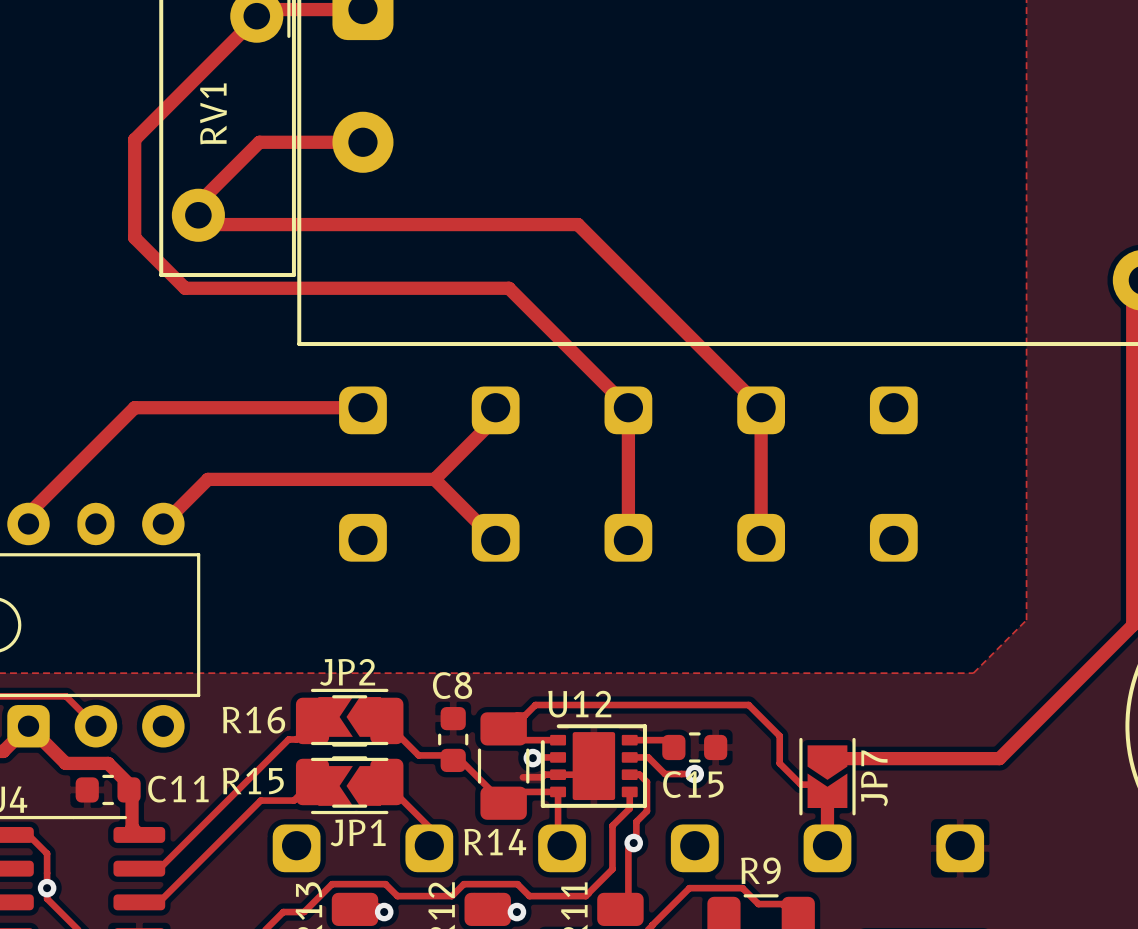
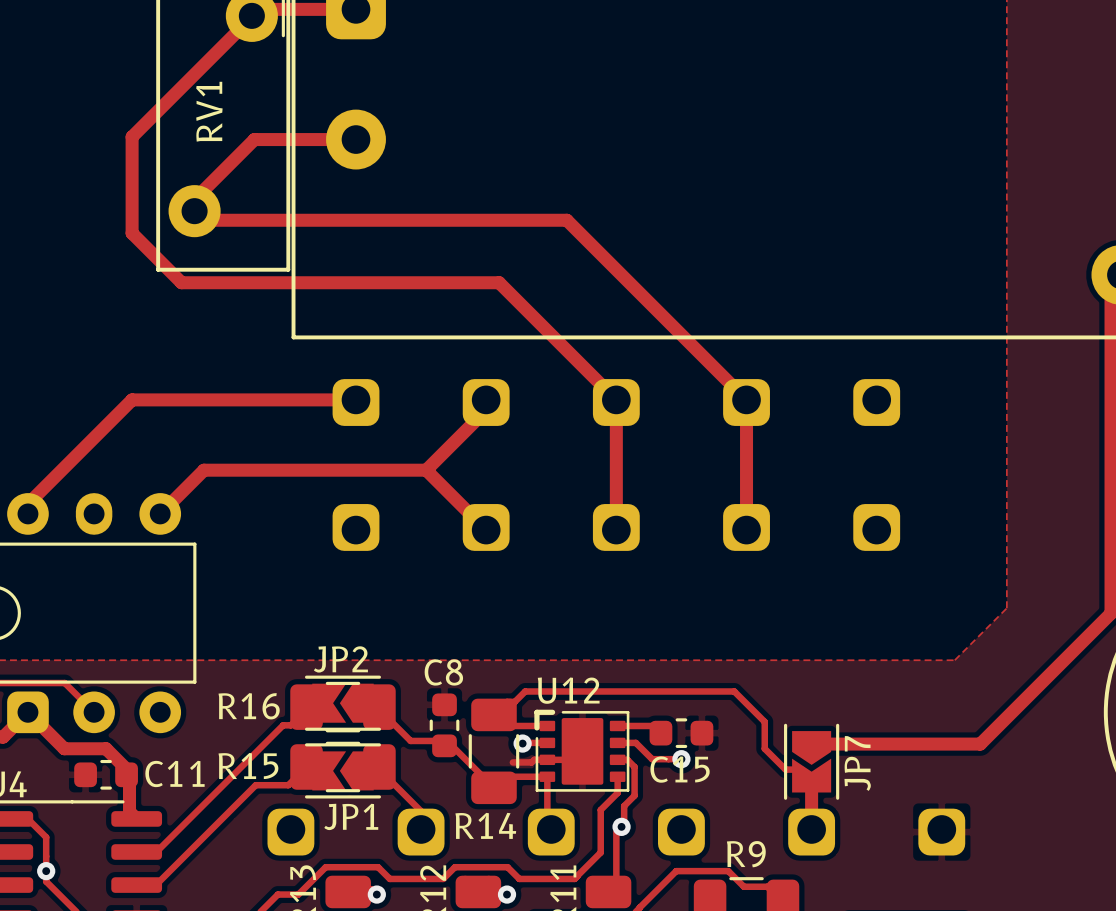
U12 footprint: [538, 722, 647, 808] -> [534, 709, 630, 792]

